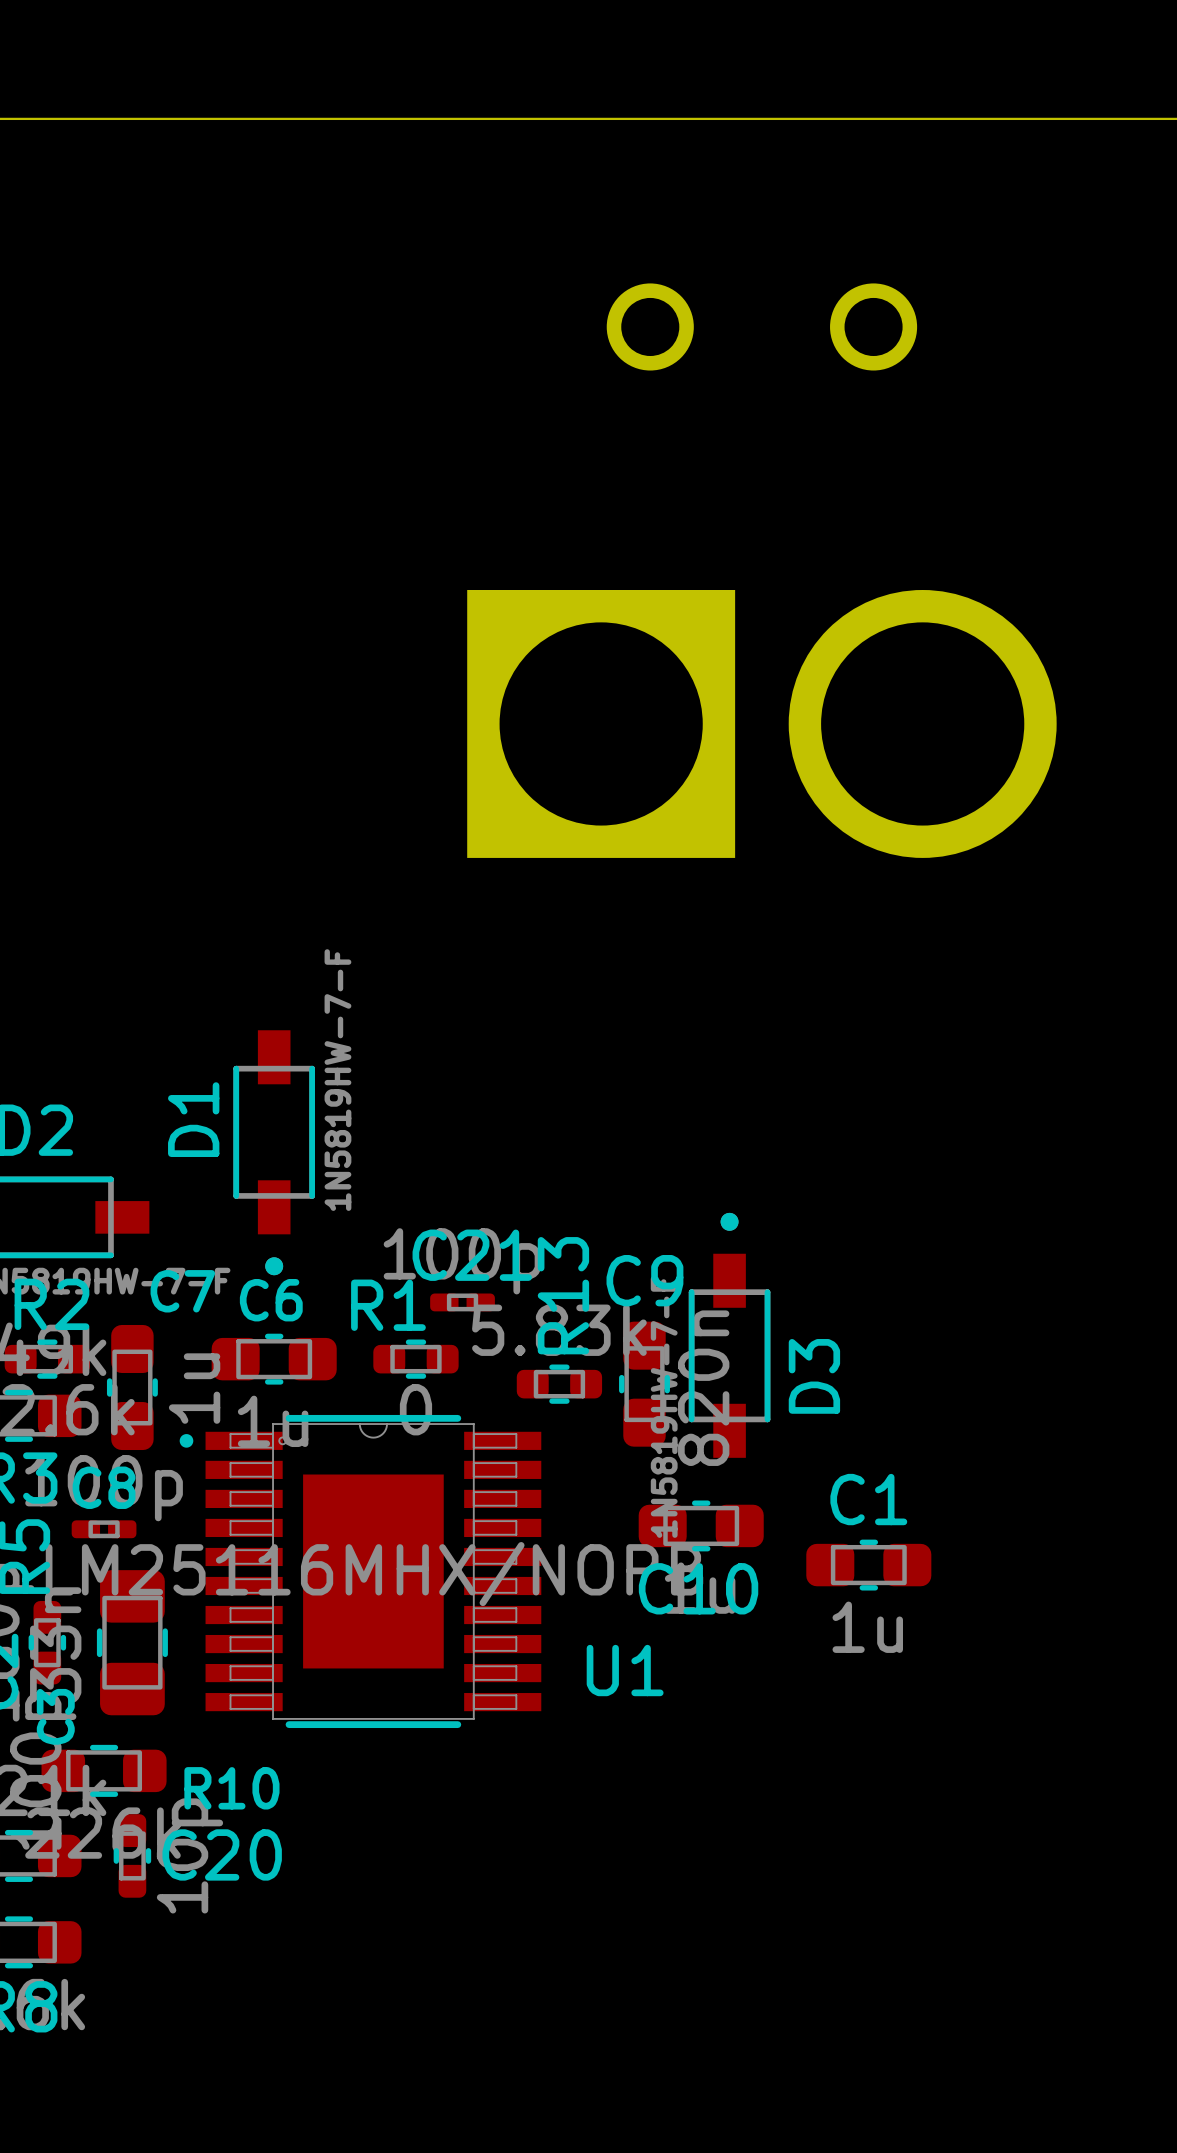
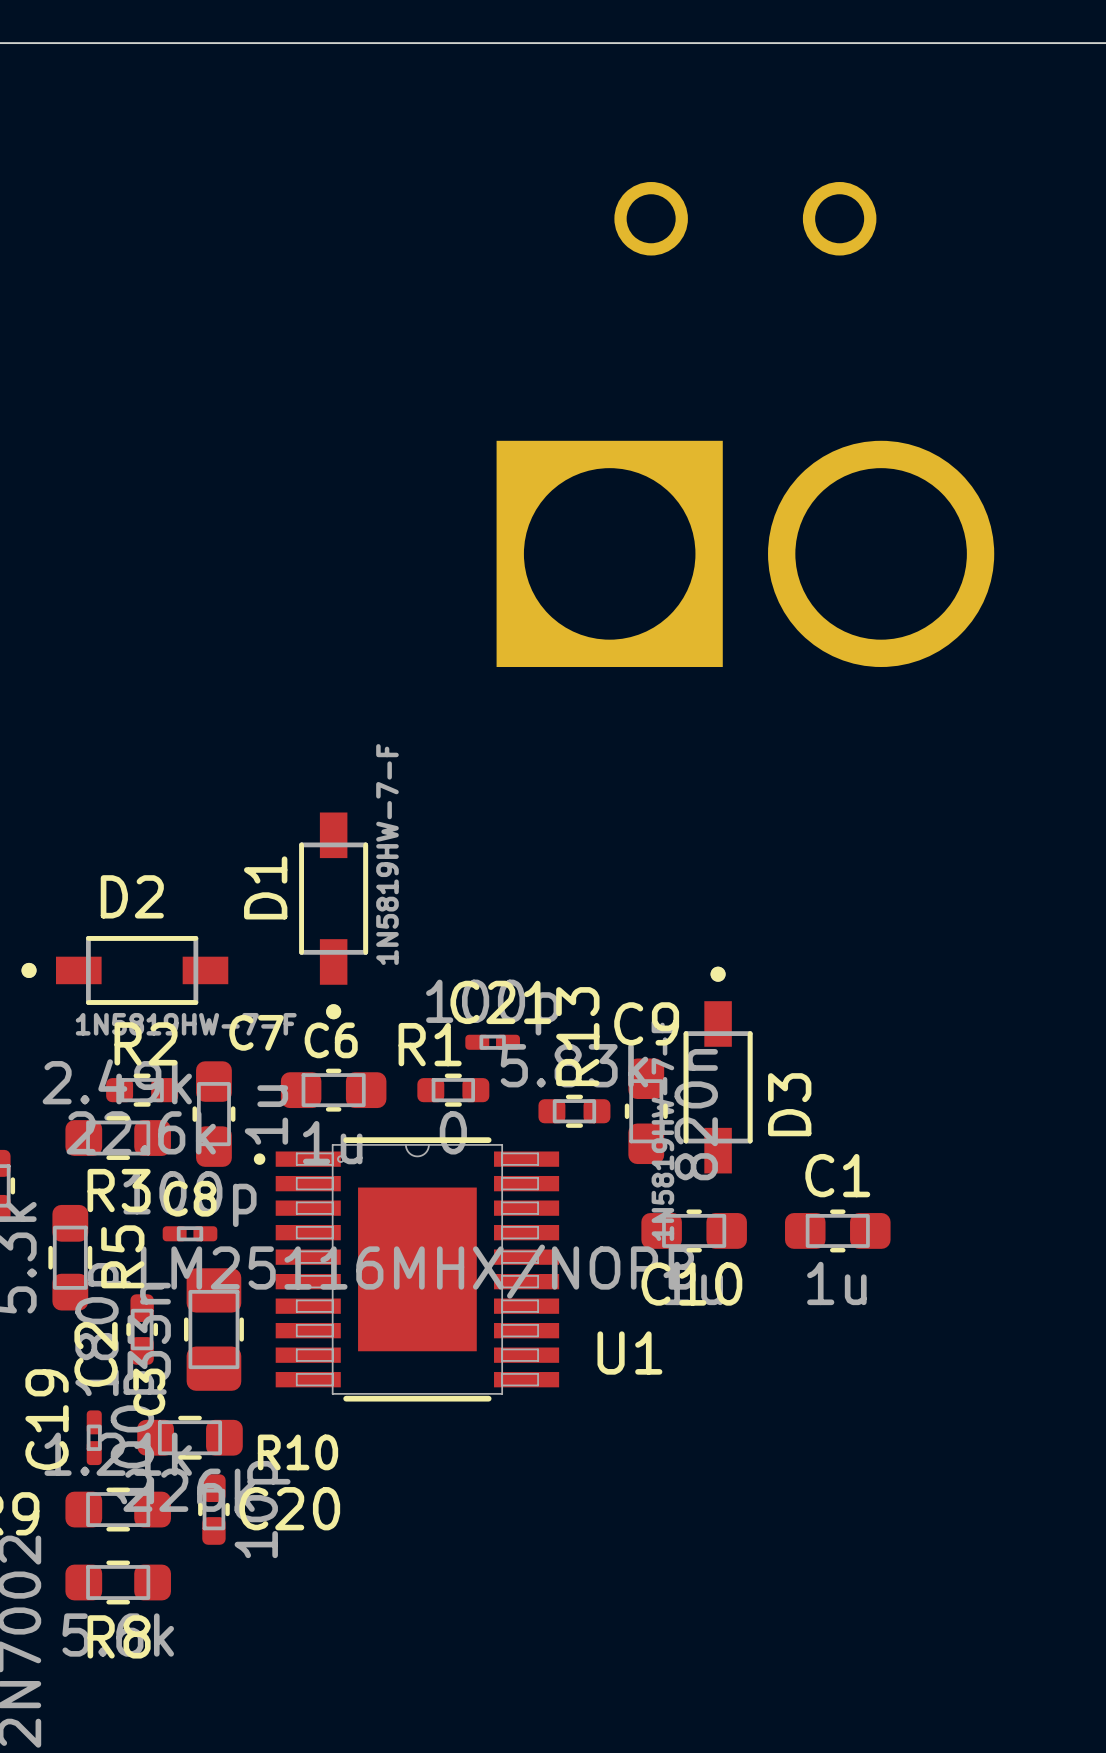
C1 position: (868, 1565) -> (837, 1230)

